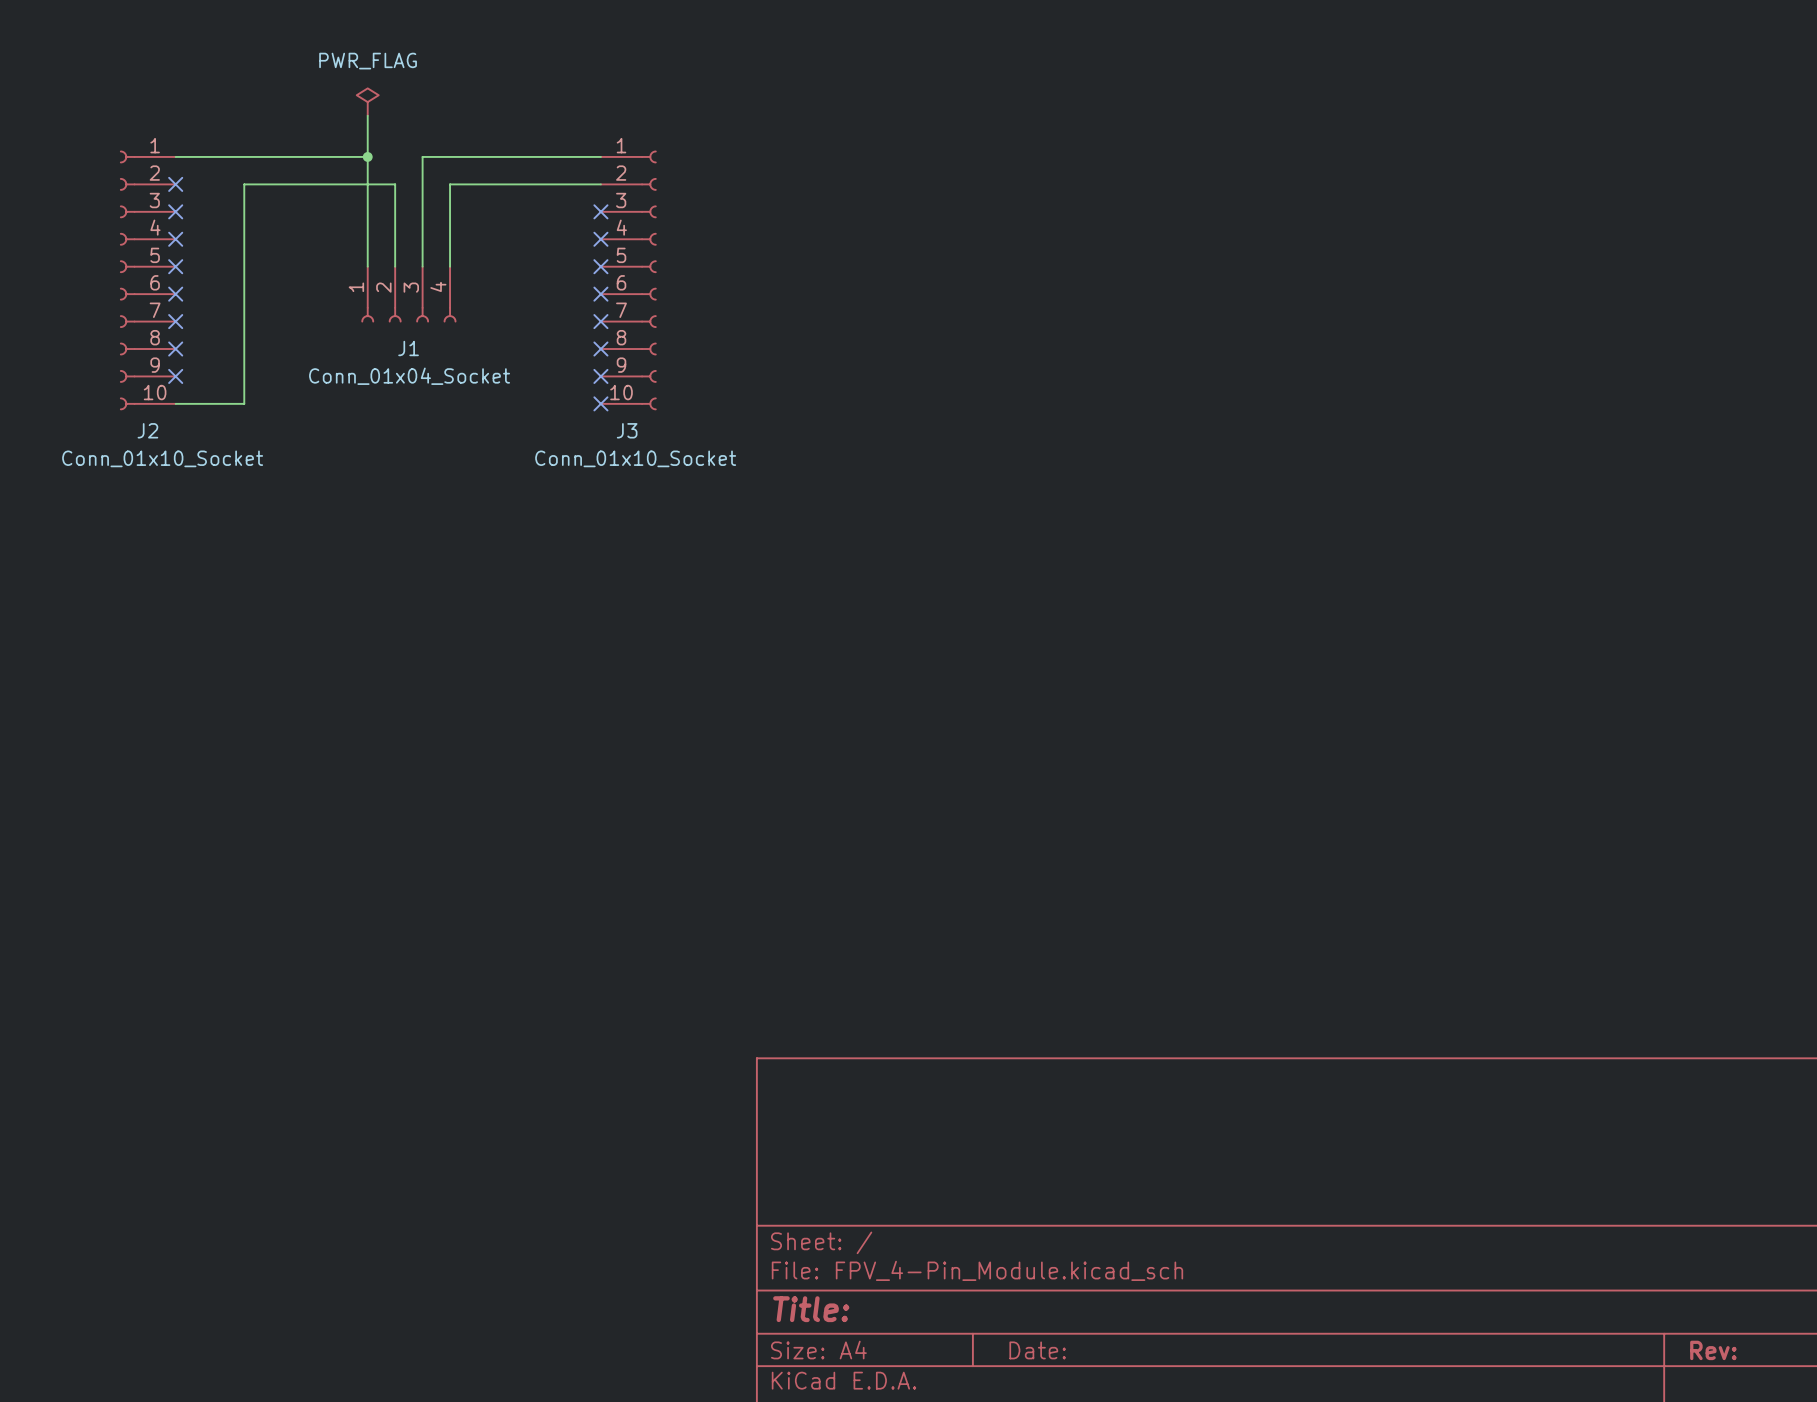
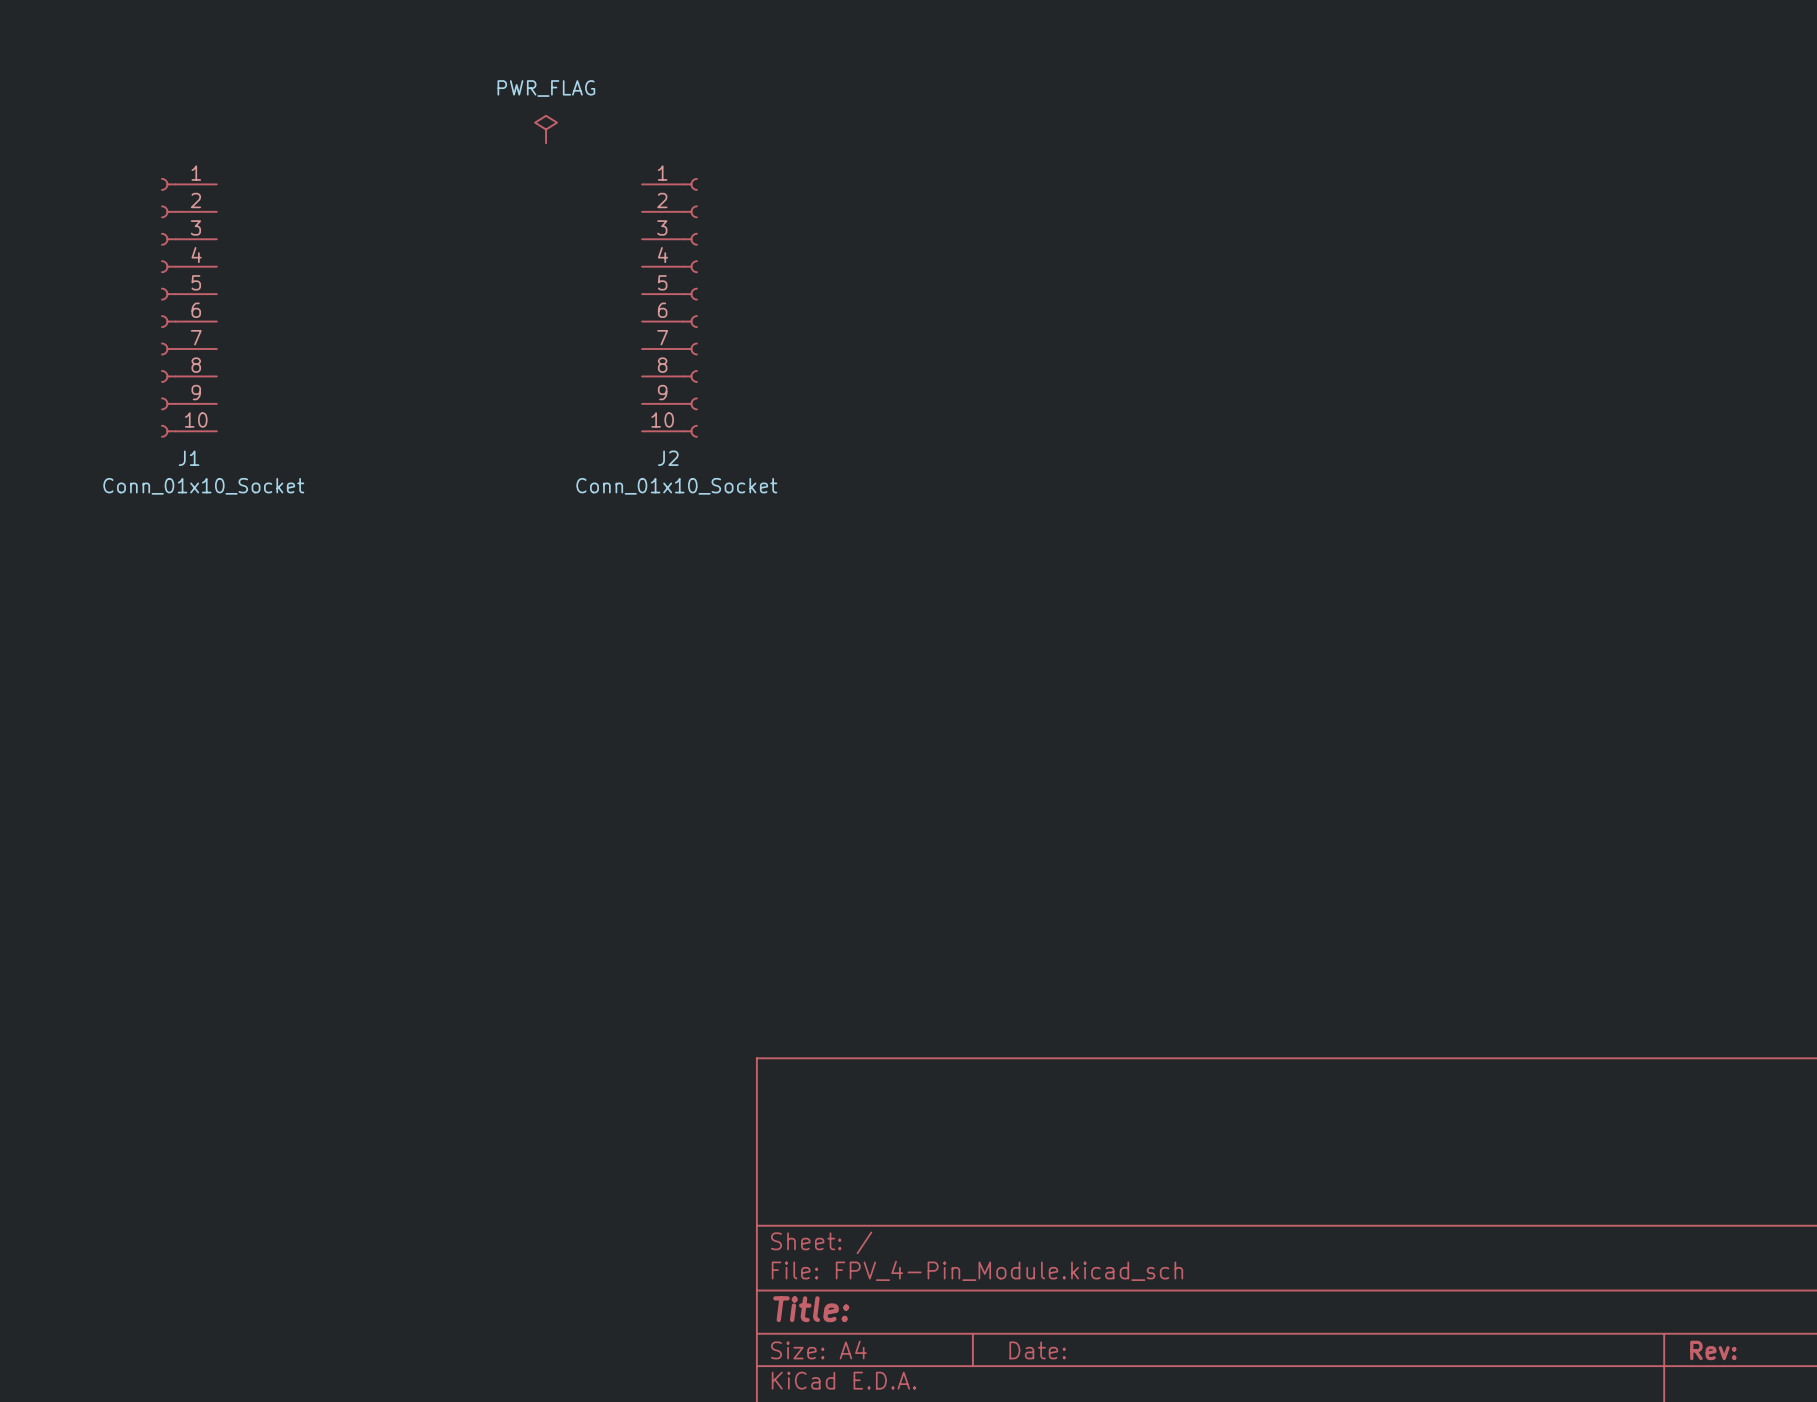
power symbol position: PWR_FLAG (367, 102) -> PWR_FLAG (546, 129)
wire: (367, 115) (367, 266) -> none
wire: (175, 156) (367, 156) -> none
junction: (367, 156) -> none
wire: (600, 156) (422, 156) (422, 266) -> none
no-connect mark: (175, 184) -> none
wire: (600, 184) (450, 184) (450, 266) -> none
no-connect mark: (175, 211) -> none
no-connect mark: (600, 211) -> none
no-connect mark: (175, 239) -> none
no-connect mark: (600, 239) -> none
no-connect mark: (175, 266) -> none
J1 symbol: [361, 266, 457, 323] -> [161, 178, 217, 438]
wire: (395, 266) (395, 184) (244, 184) (244, 403) (175, 403) -> none
no-connect mark: (600, 266) -> none
J2 flip: as is (127, 280) -> left-right (690, 307)
J2 position: (147, 280) -> (669, 307)
J3: Conn_01x10_Socket (628, 280) -> none
no-connect mark: (175, 294) -> none
no-connect mark: (600, 294) -> none
no-connect mark: (175, 321) -> none
no-connect mark: (600, 321) -> none
J1 name position: J1 (408, 348) -> J1 (189, 458)
no-connect mark: (175, 349) -> none
no-connect mark: (600, 349) -> none
no-connect mark: (175, 376) -> none
J1 value: Conn_01x04_Socket (409, 376) -> Conn_01x10_Socket (203, 486)
no-connect mark: (600, 376) -> none
no-connect mark: (600, 403) -> none

